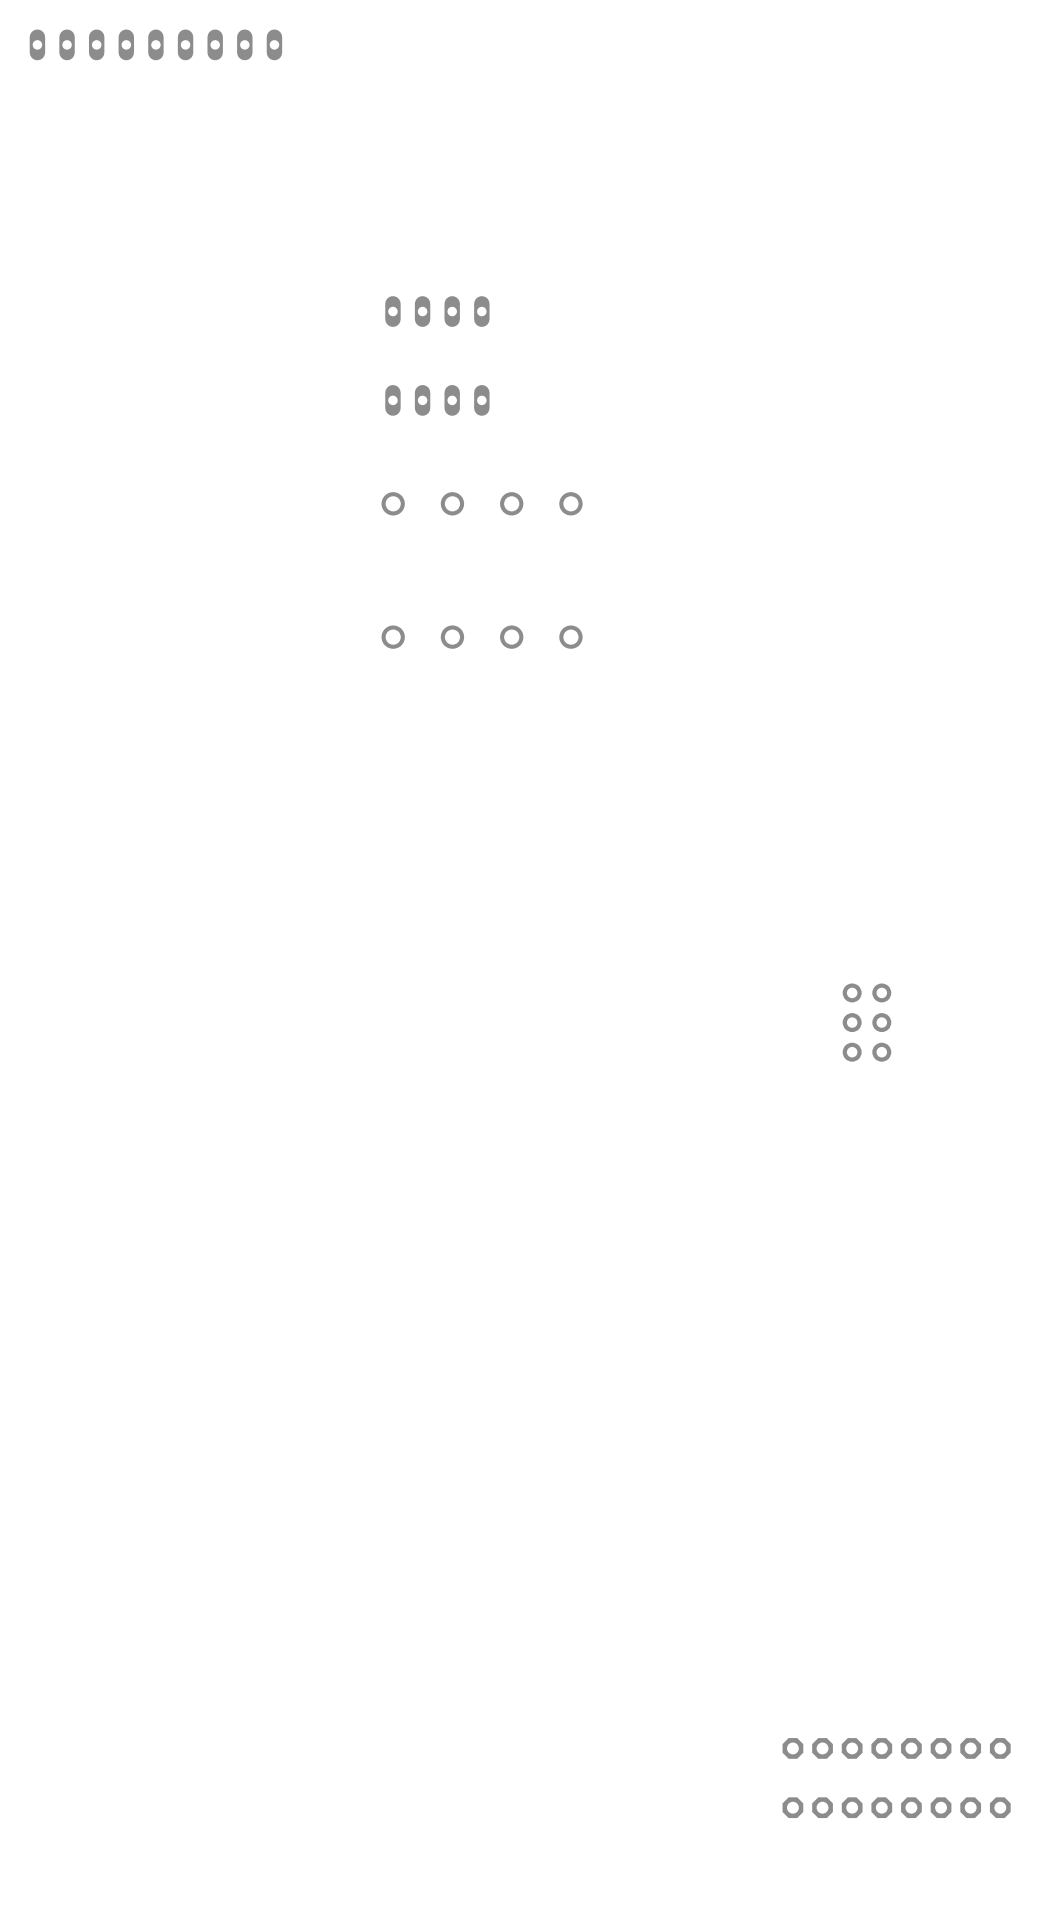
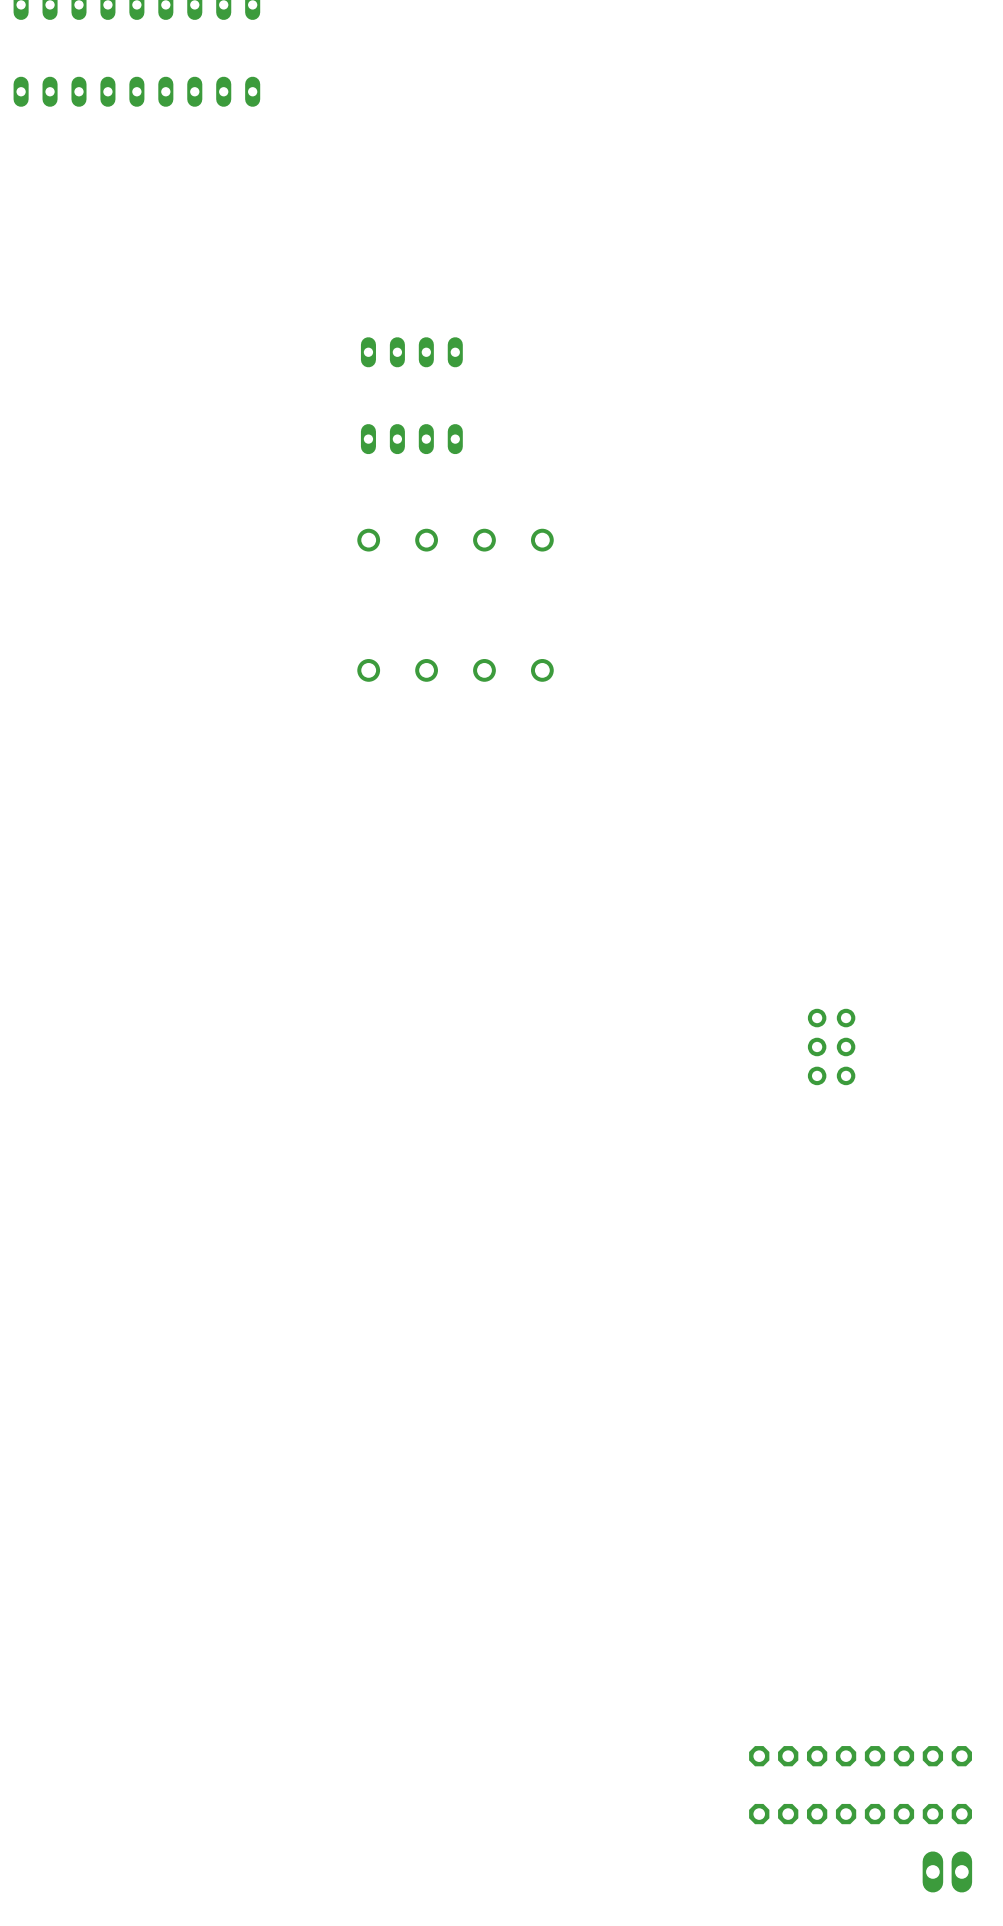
part: none -> (947, 1871)

